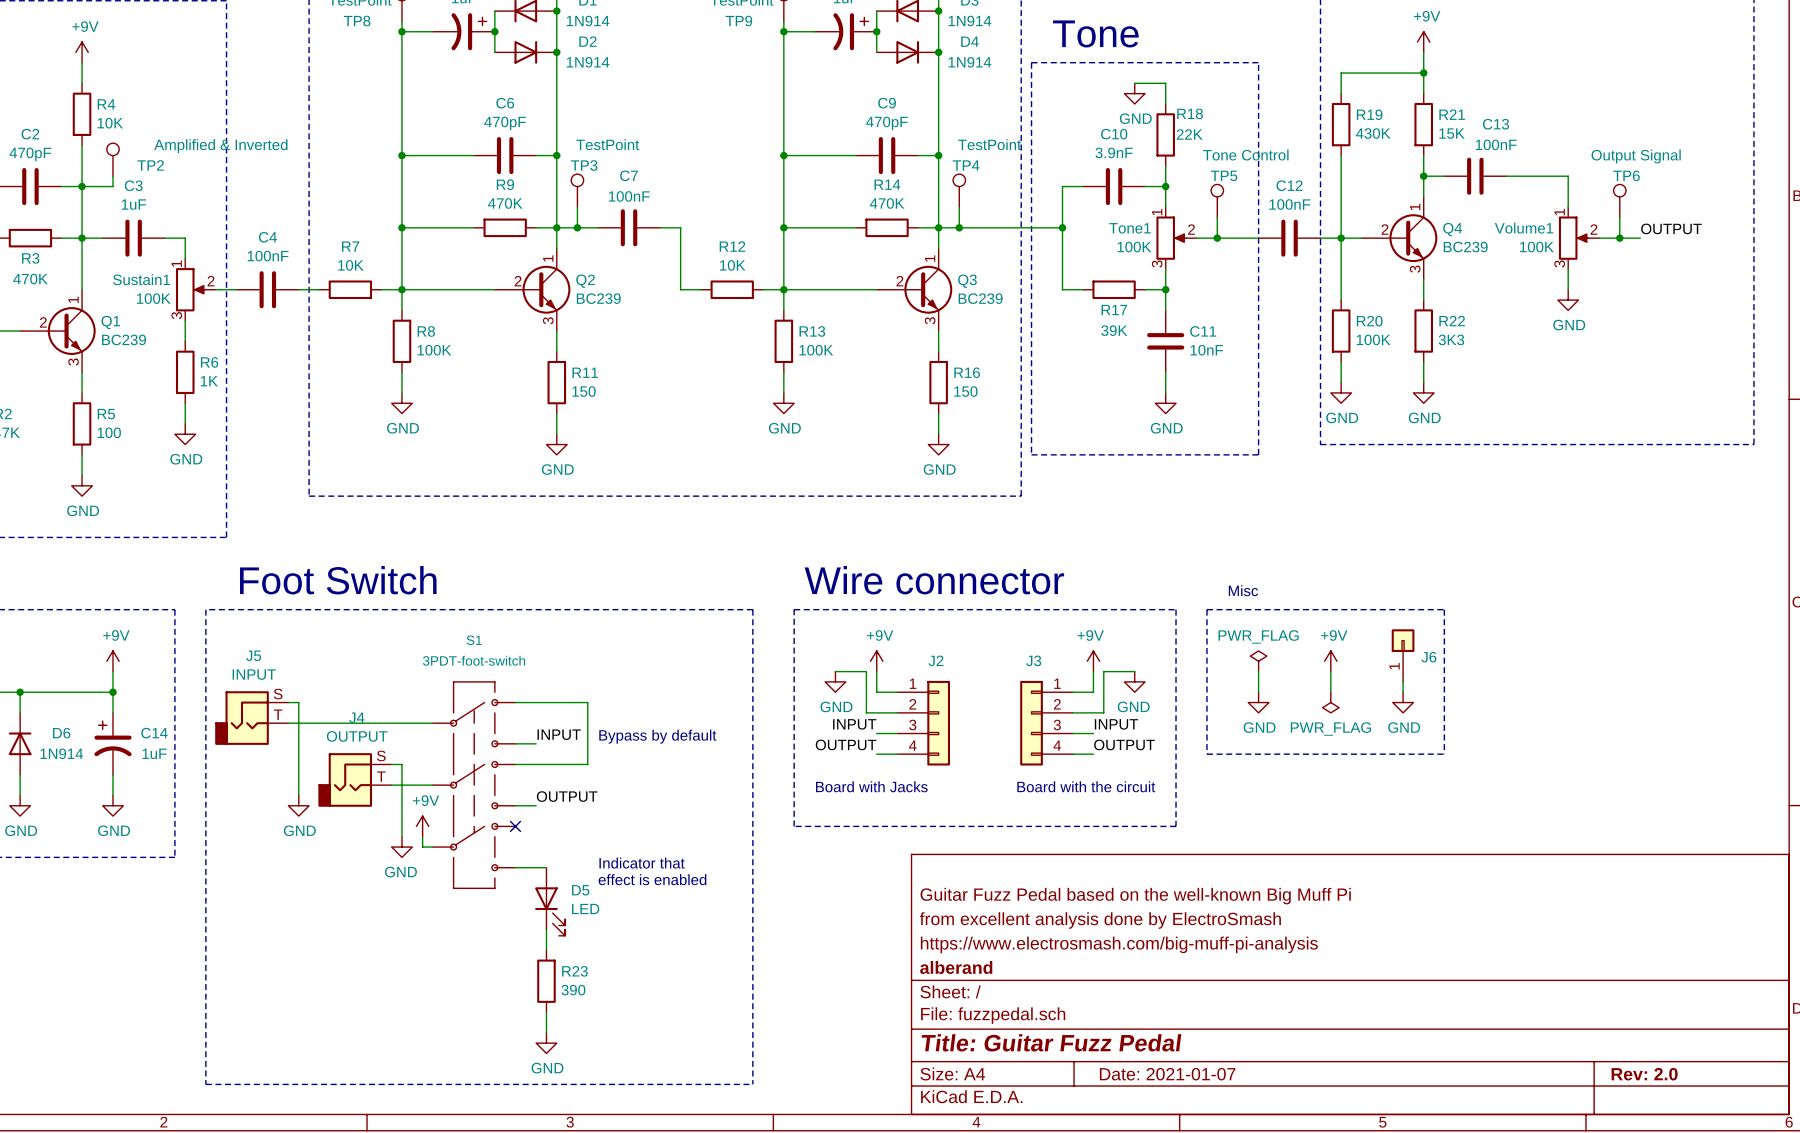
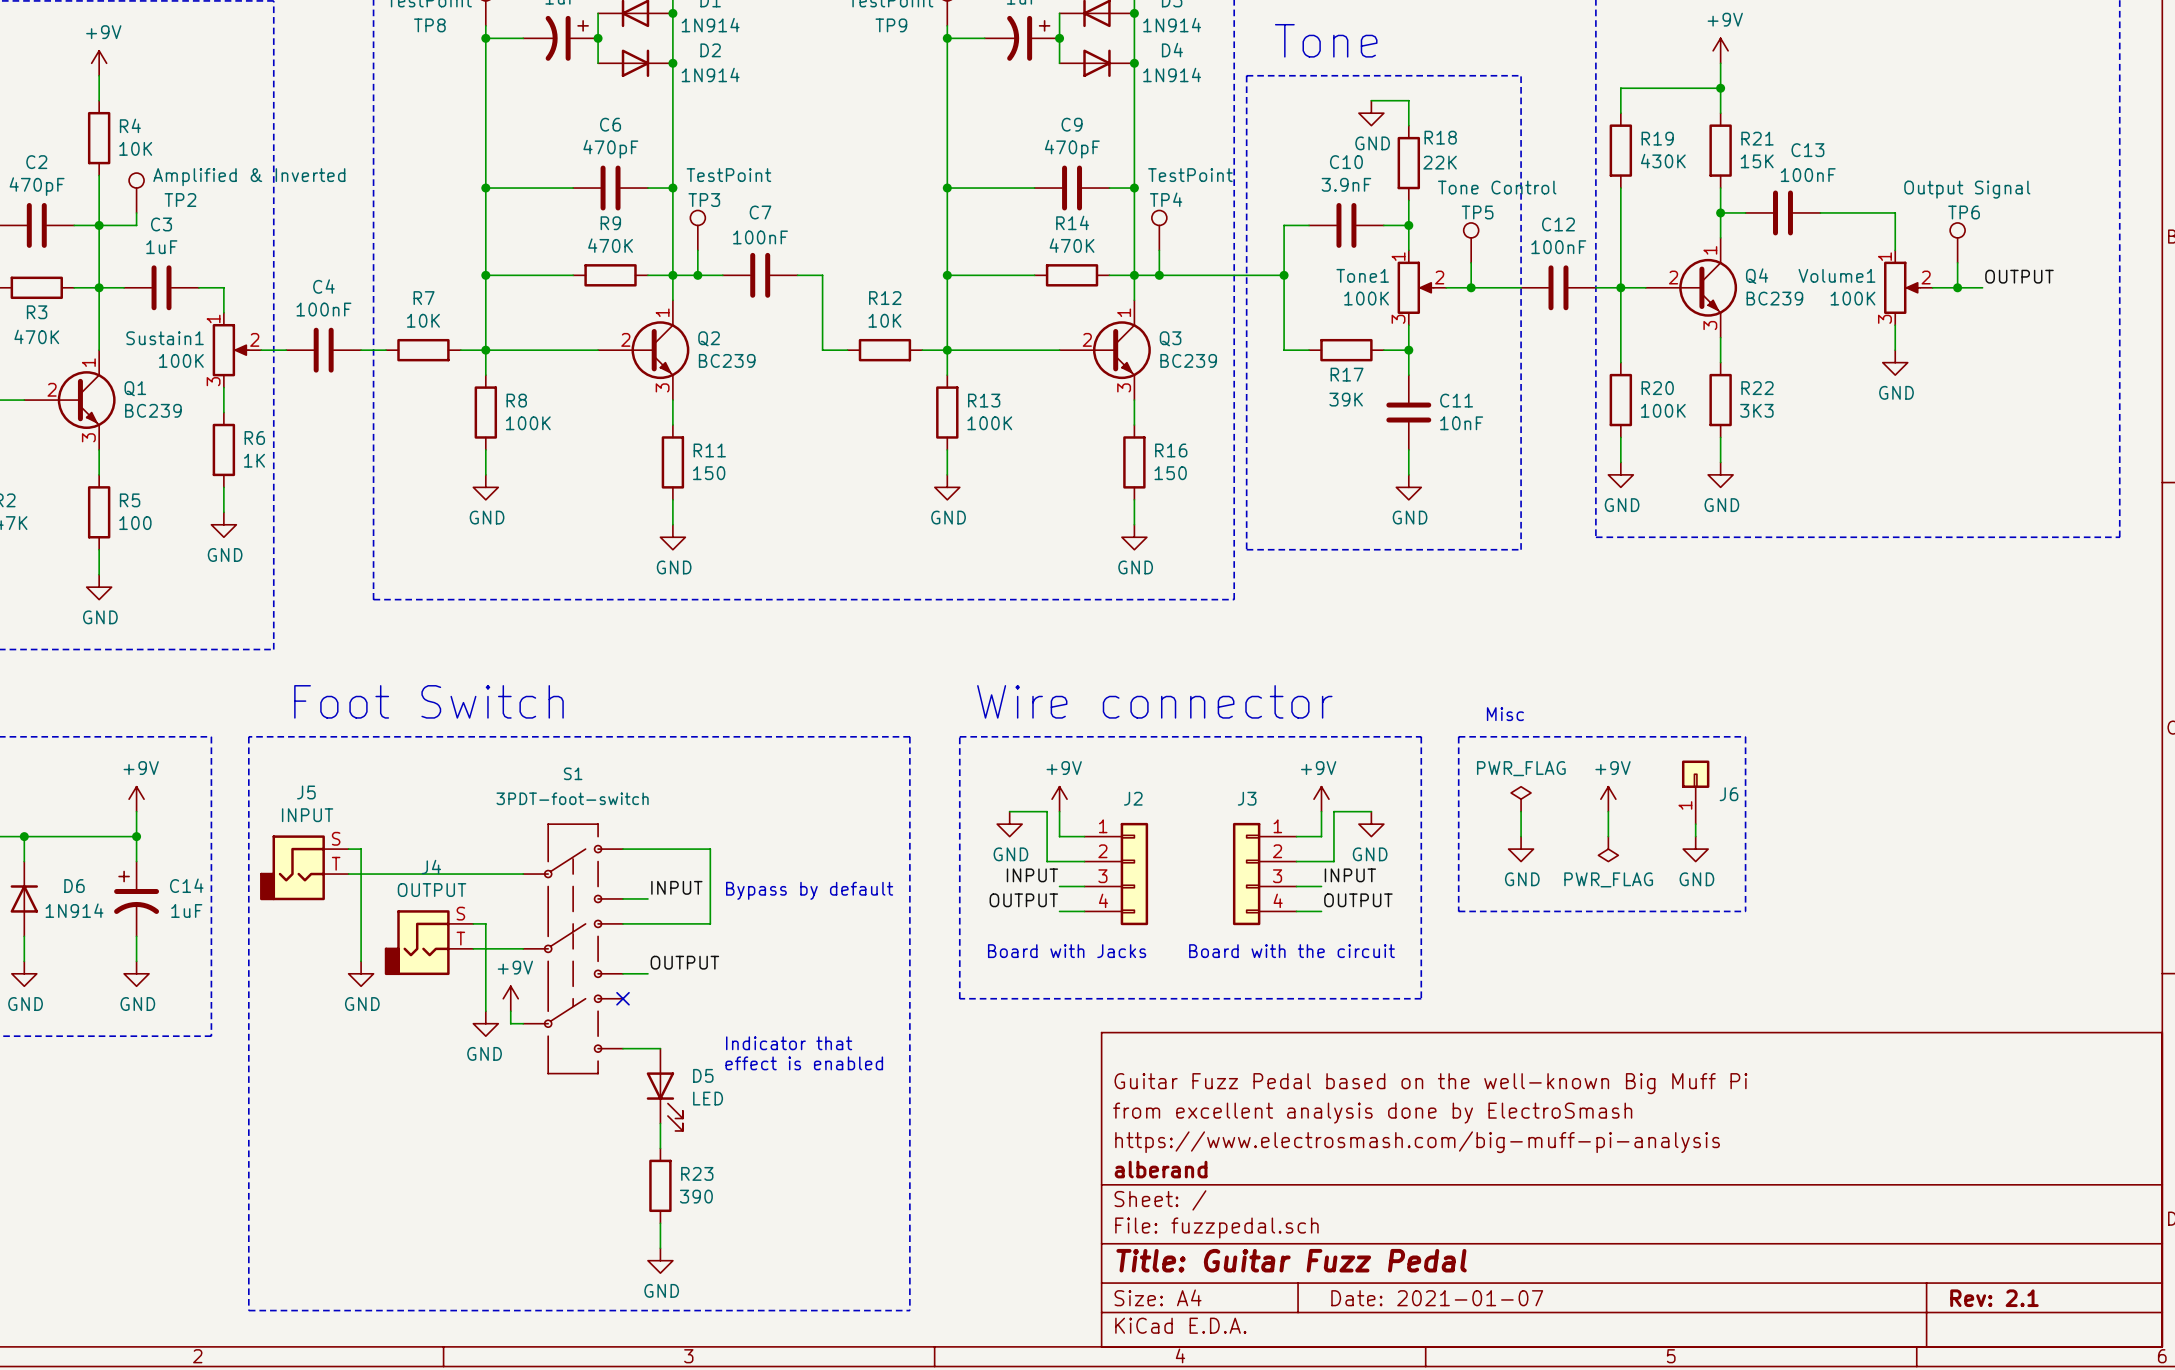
title block: Rev: 2.0 (1644, 1074) -> Rev: 2.1 (1994, 1298)

